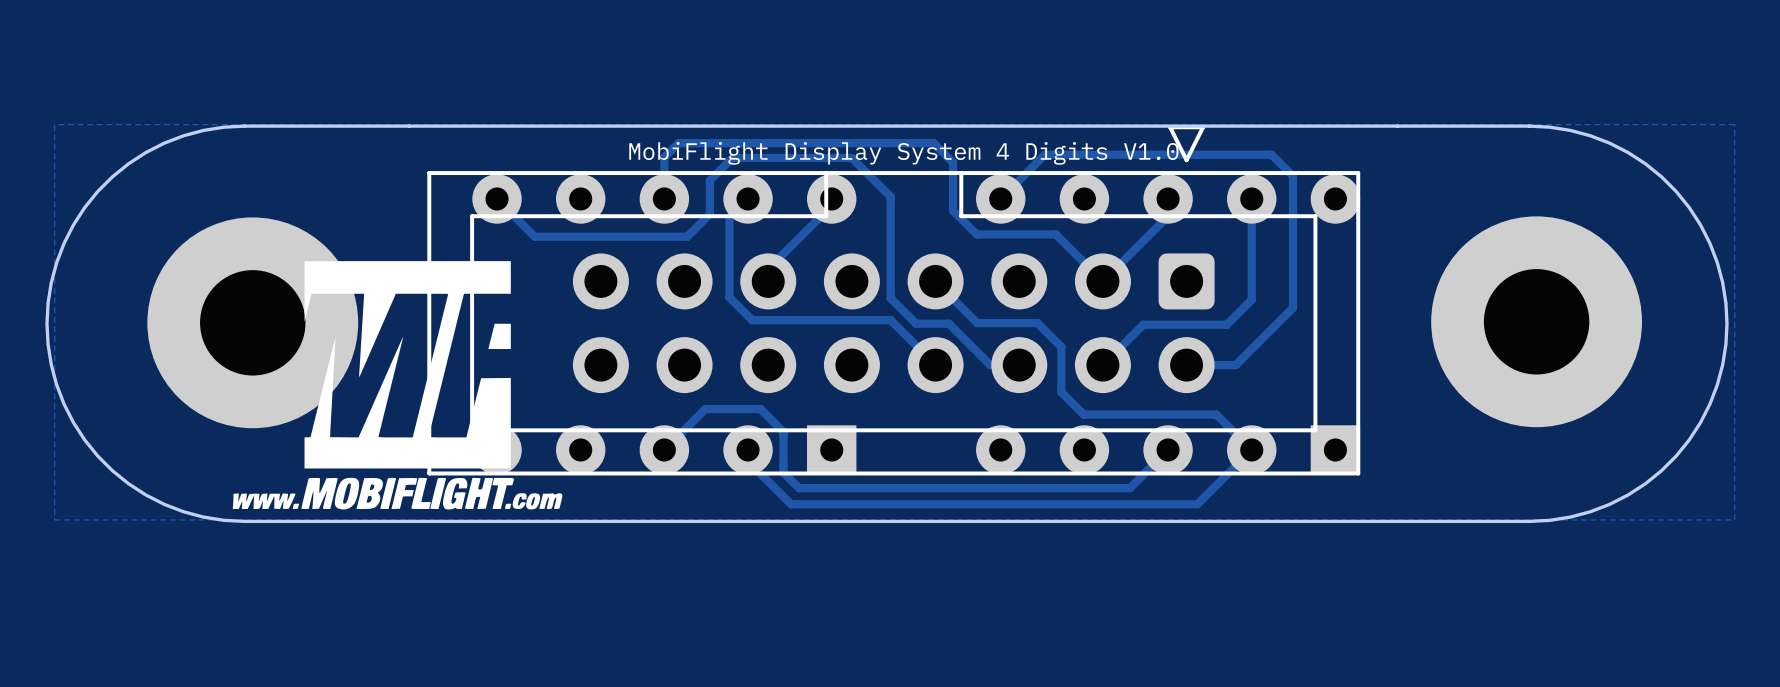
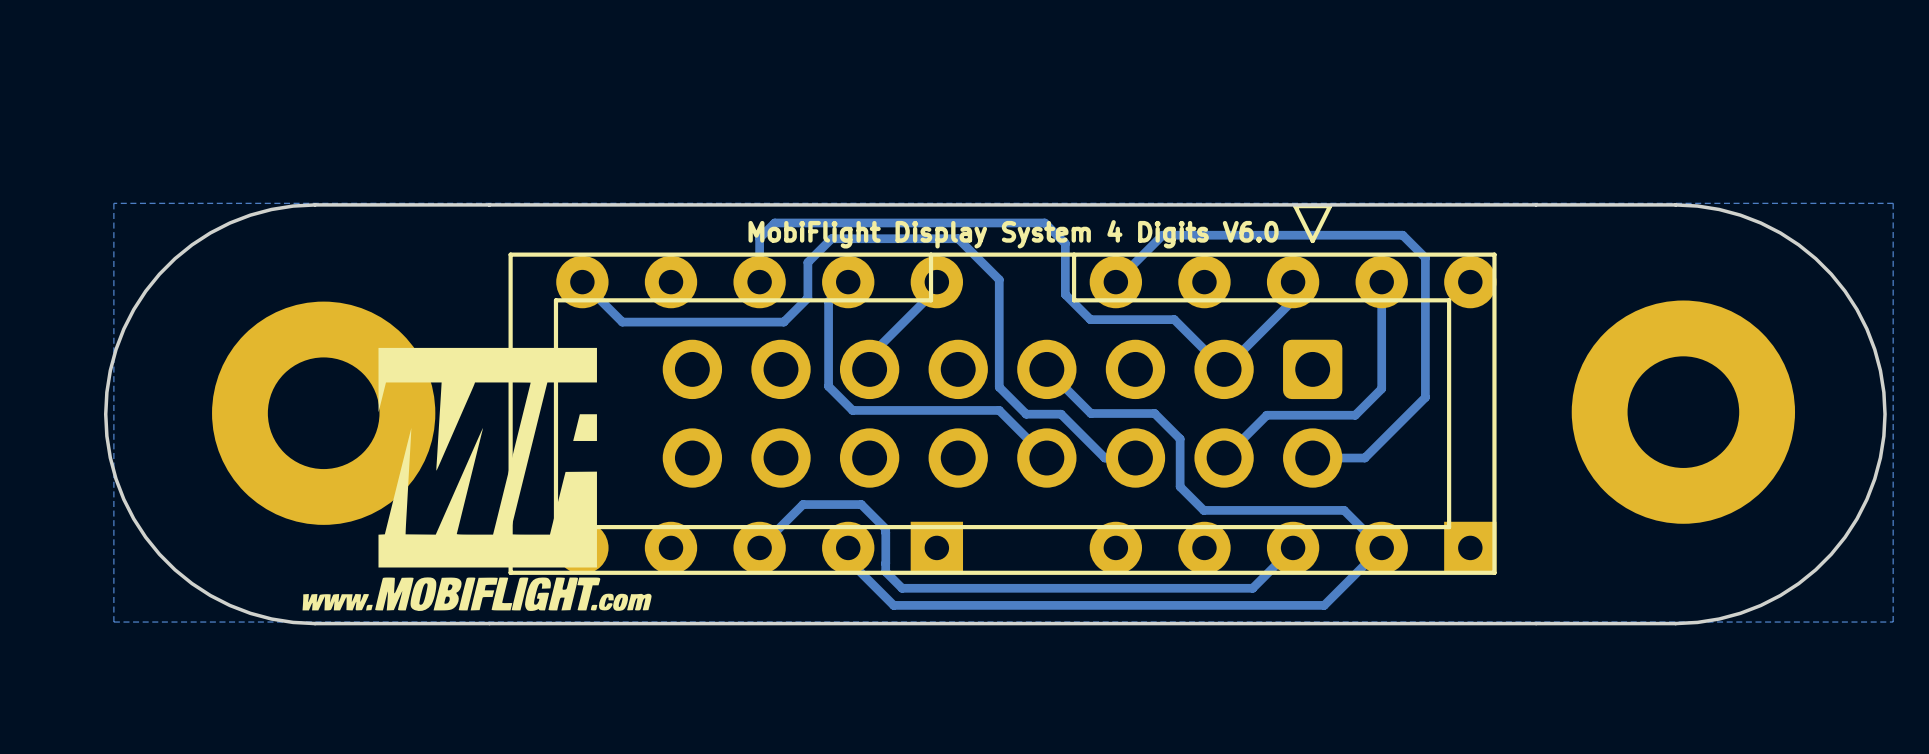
text: MobiFlight Display System 4 Digits V1.0 (903, 153) -> MobiFlight Display System 4 Digits V6.0 (1013, 234)

